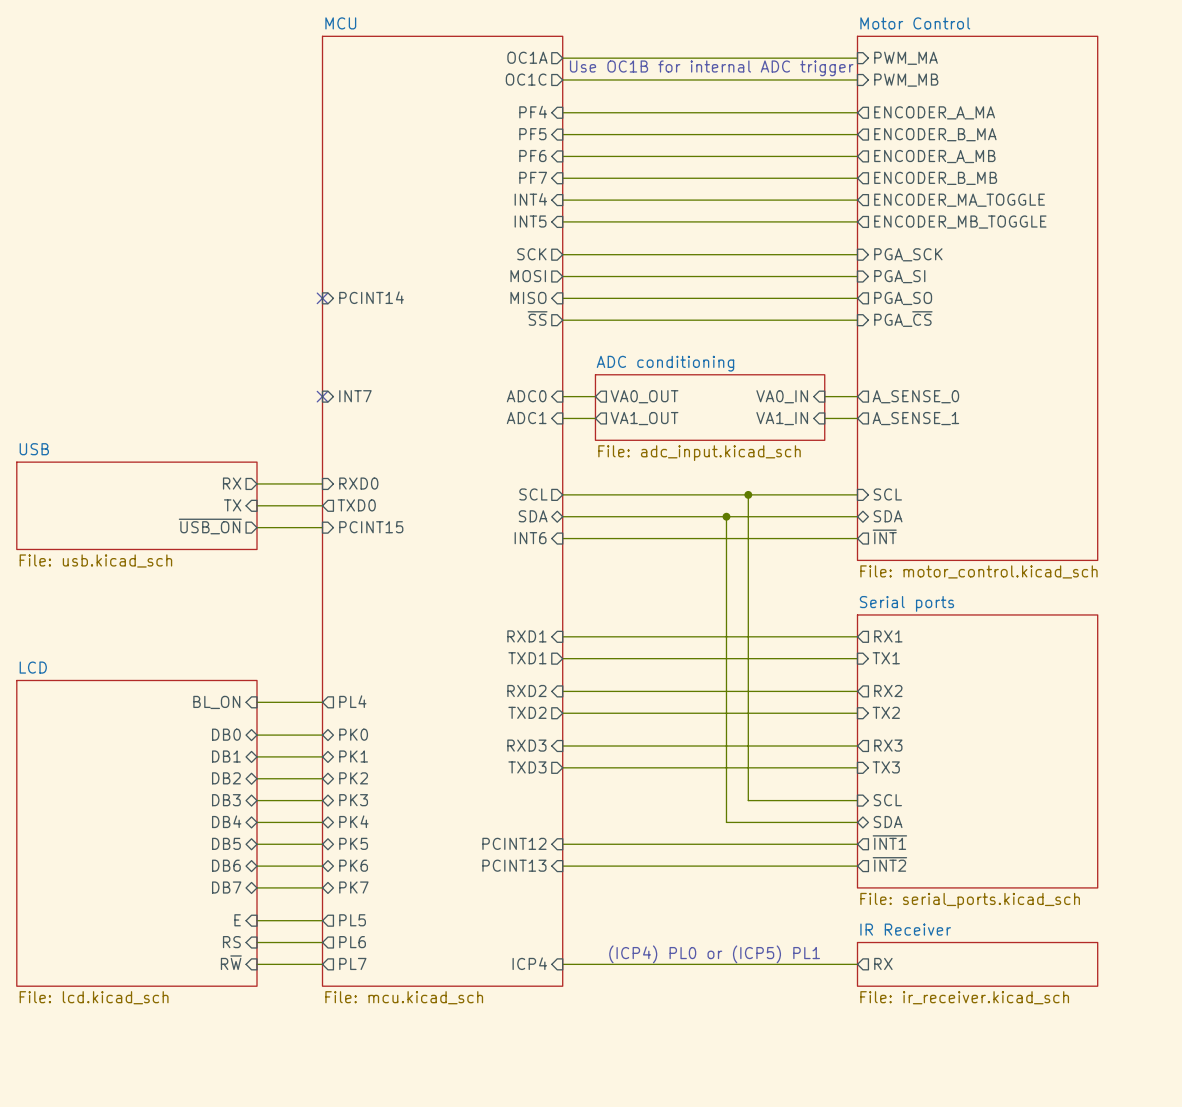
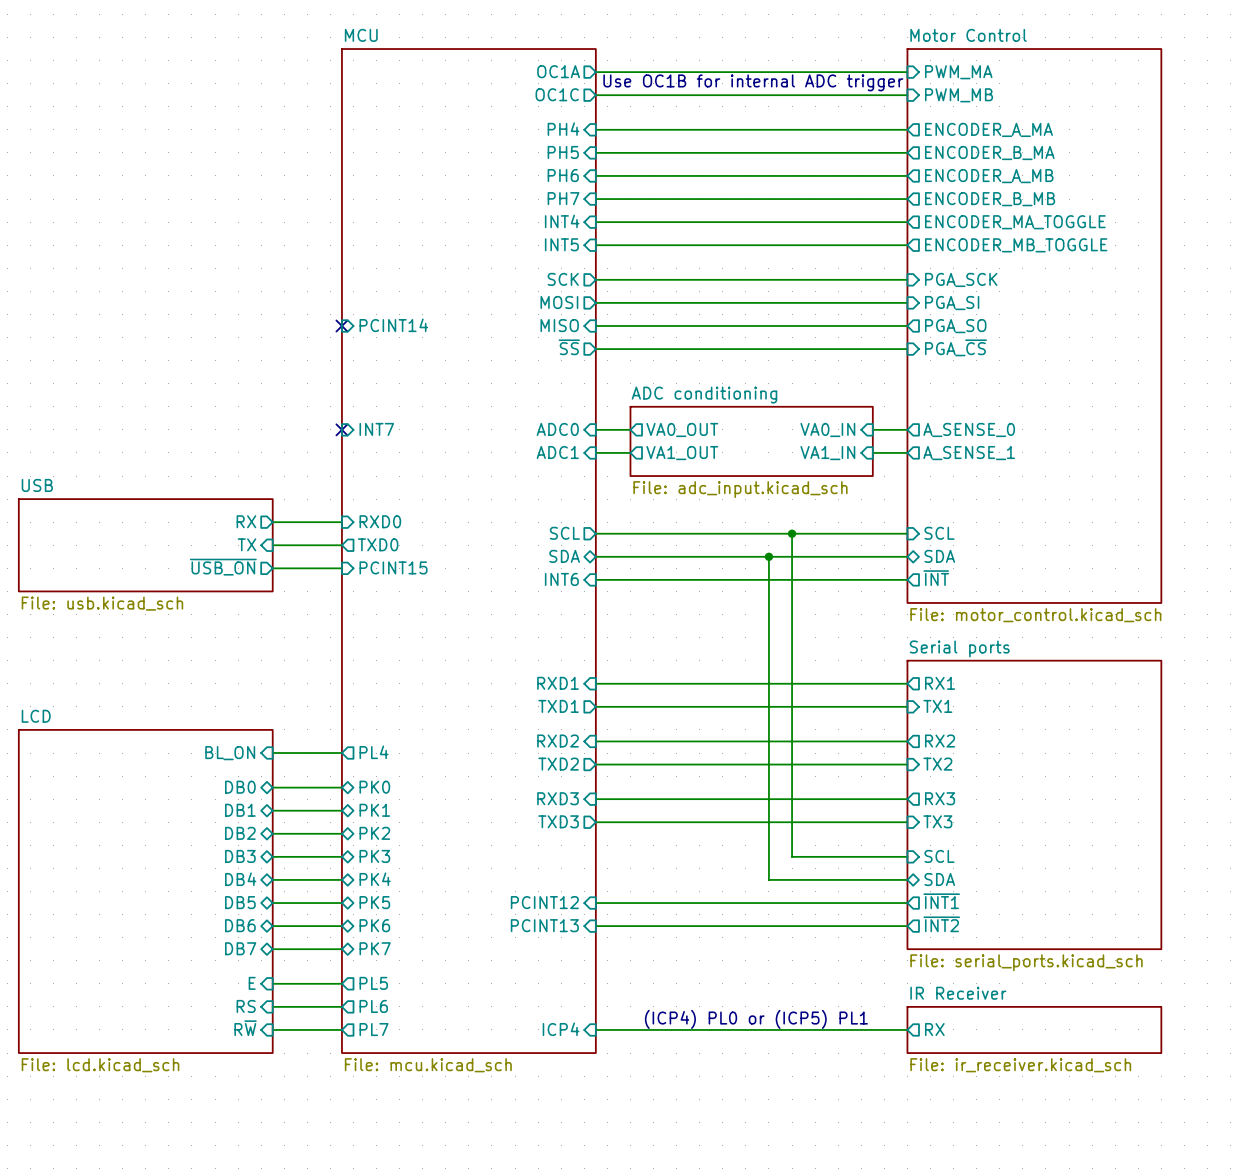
sheet pin: PF4 (533, 112) -> PH4 (563, 129)
sheet pin: PF5 (532, 134) -> PH5 (563, 152)
sheet pin: PF6 (532, 156) -> PH6 (563, 175)
sheet pin: PF7 (533, 177) -> PH7 (563, 198)

